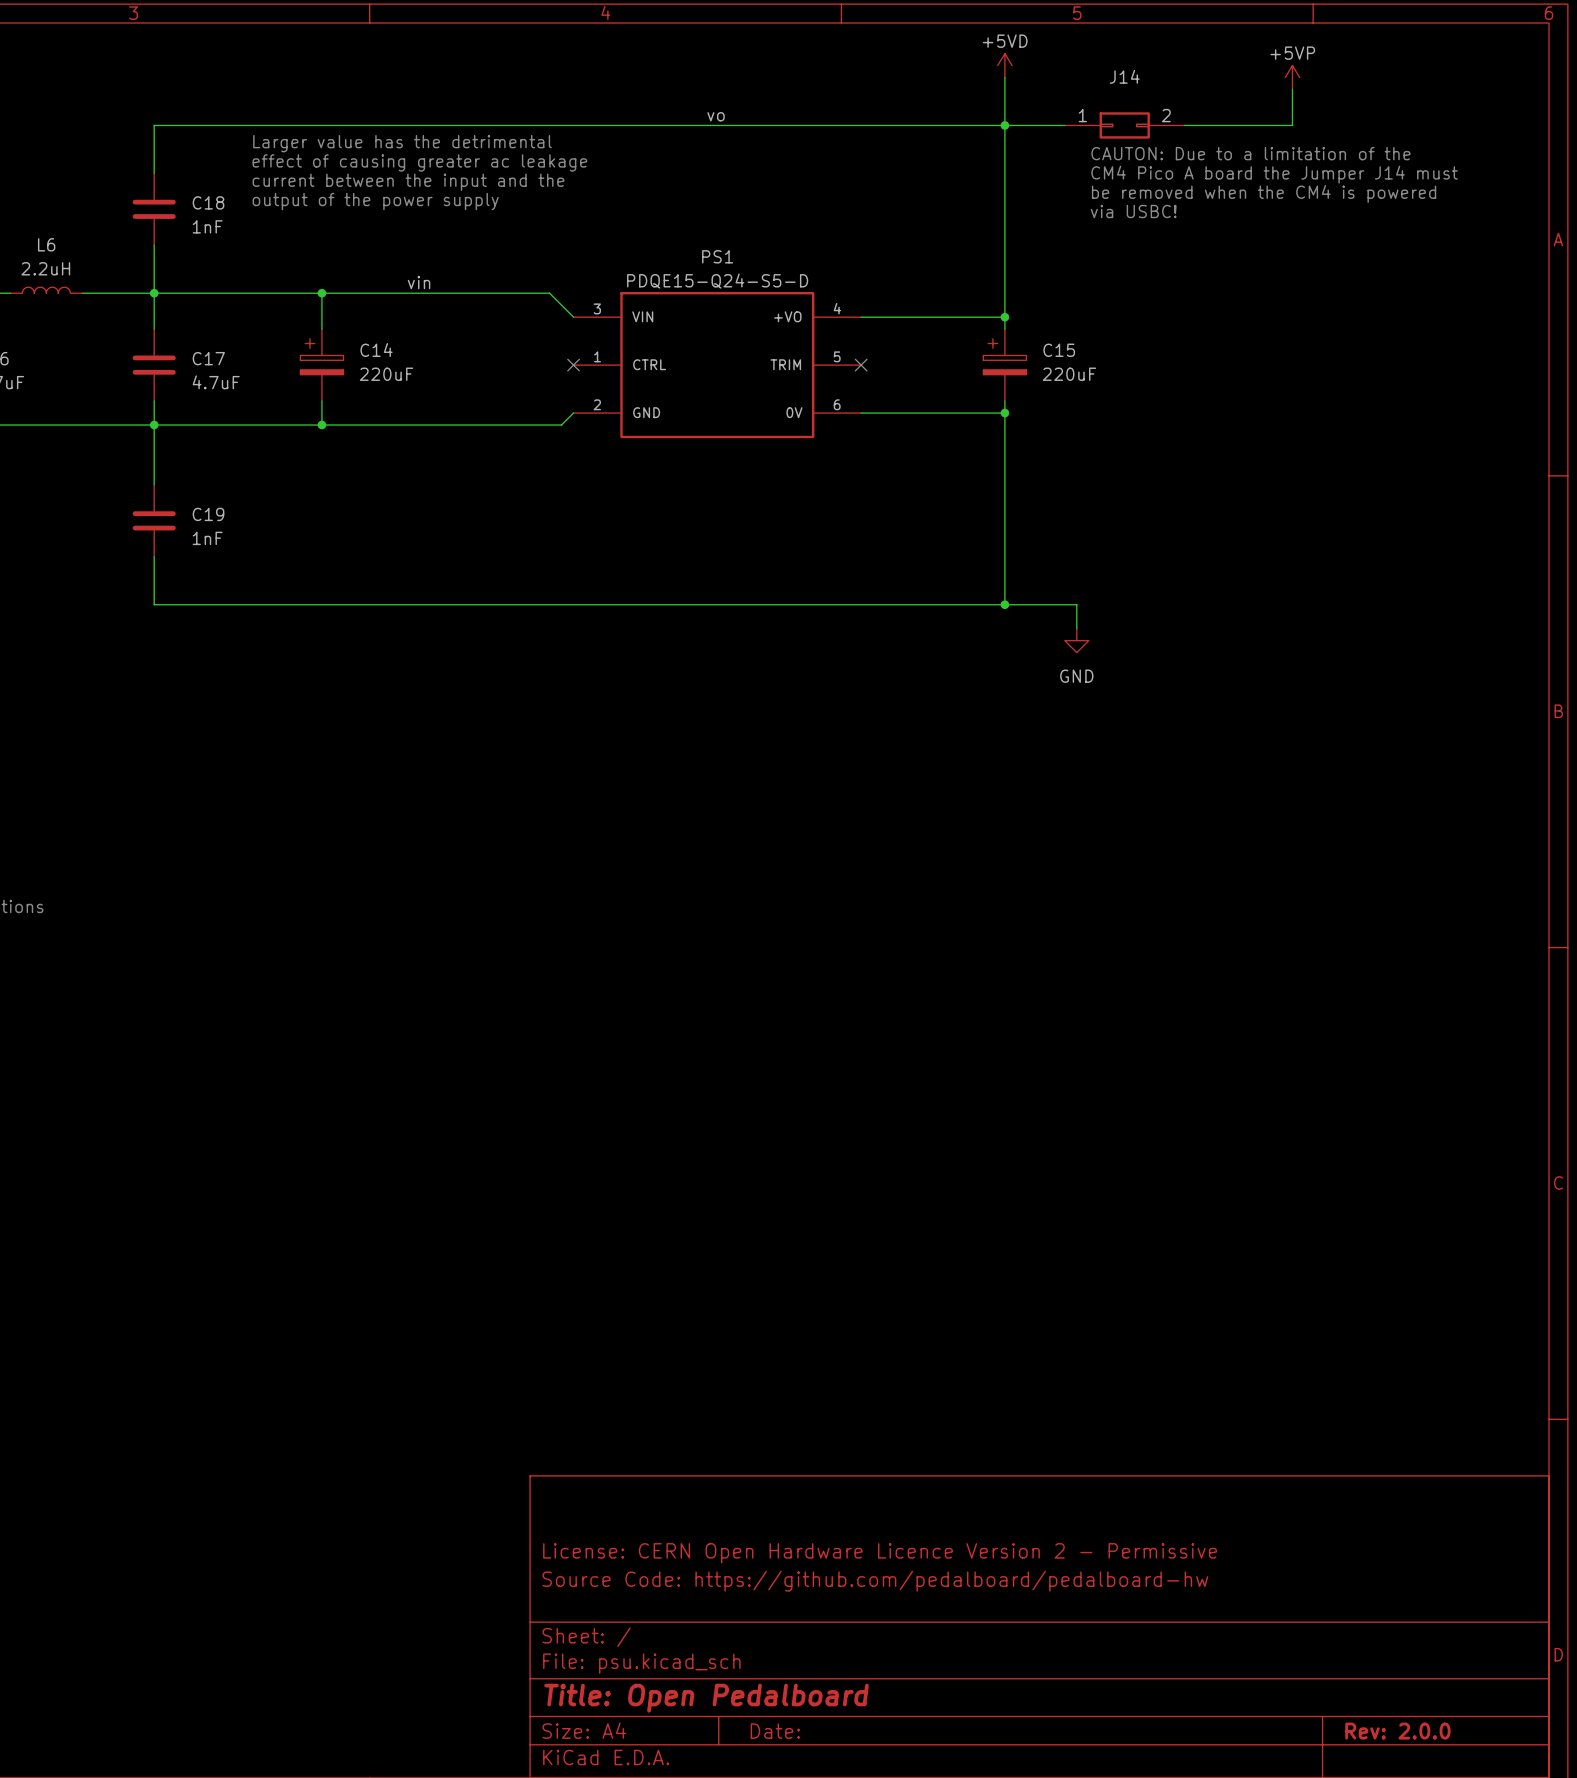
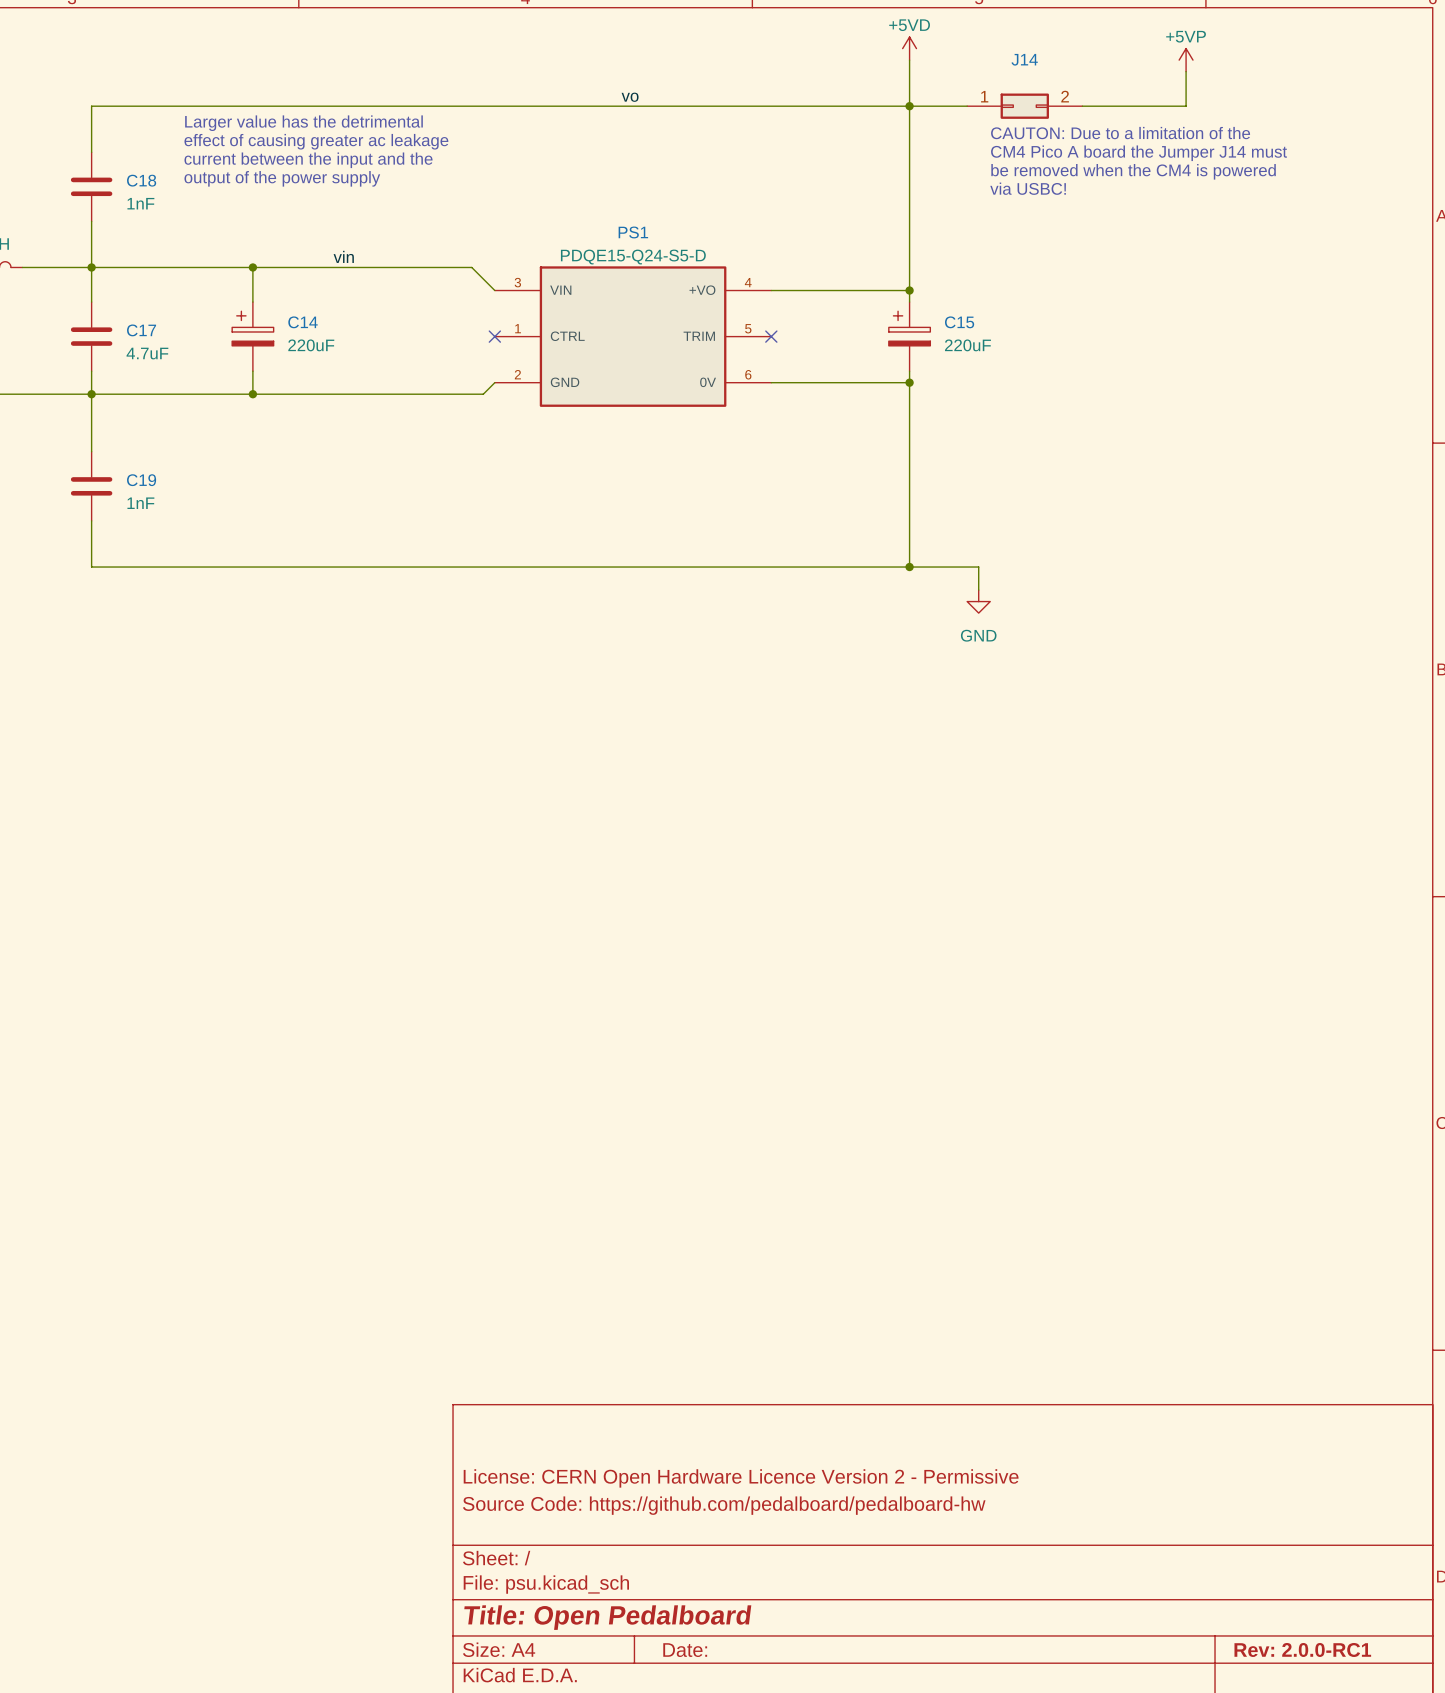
title block: Rev: 2.0.0 (1397, 1731) -> Rev: 2.0.0-RC1 (1302, 1649)

